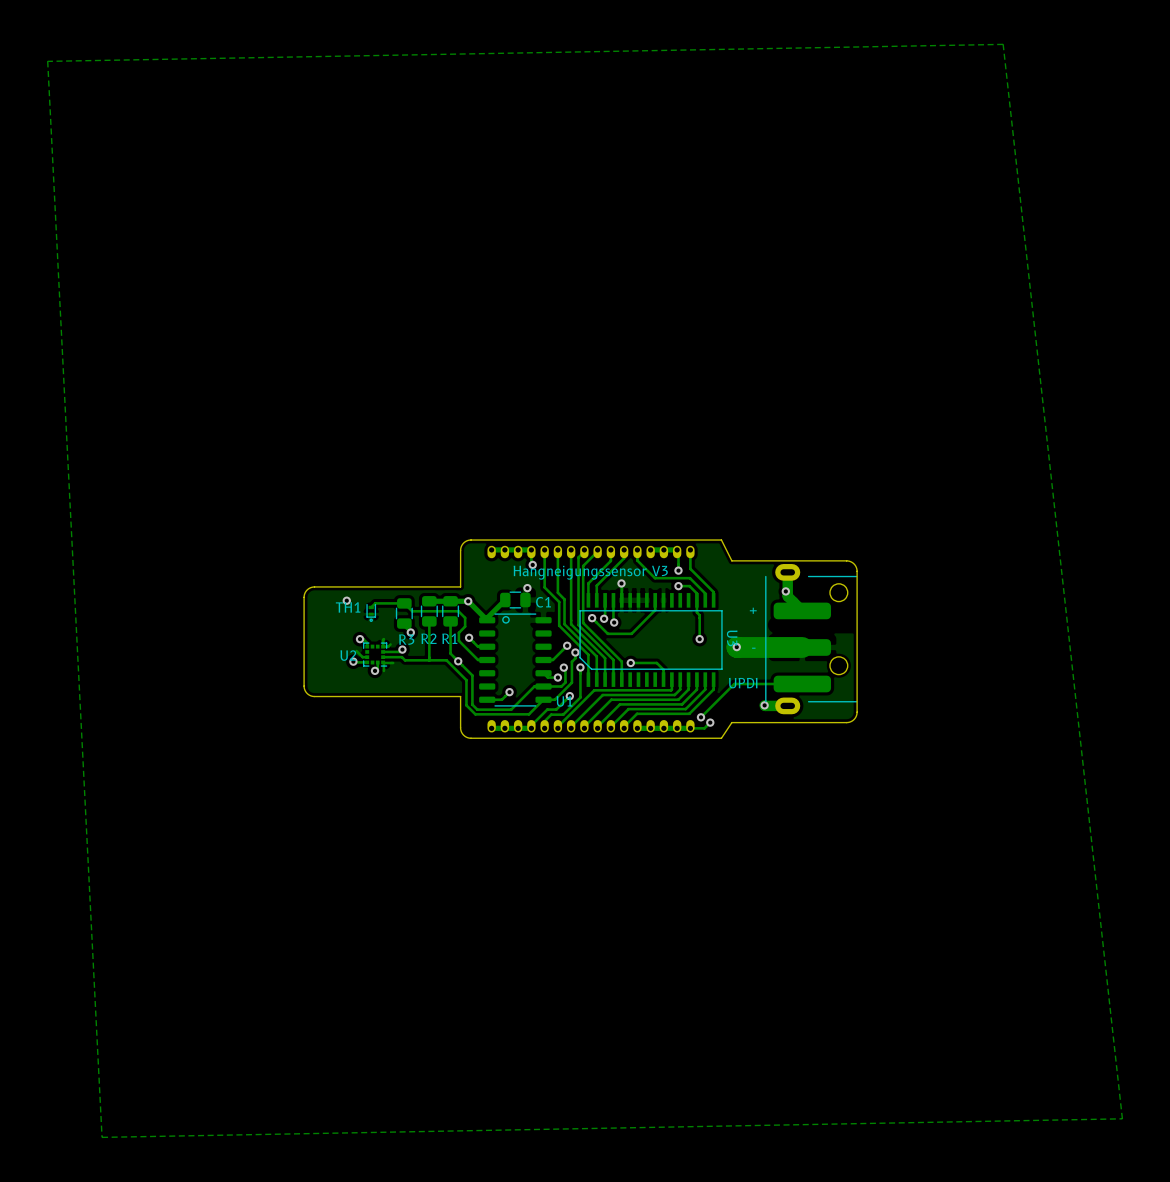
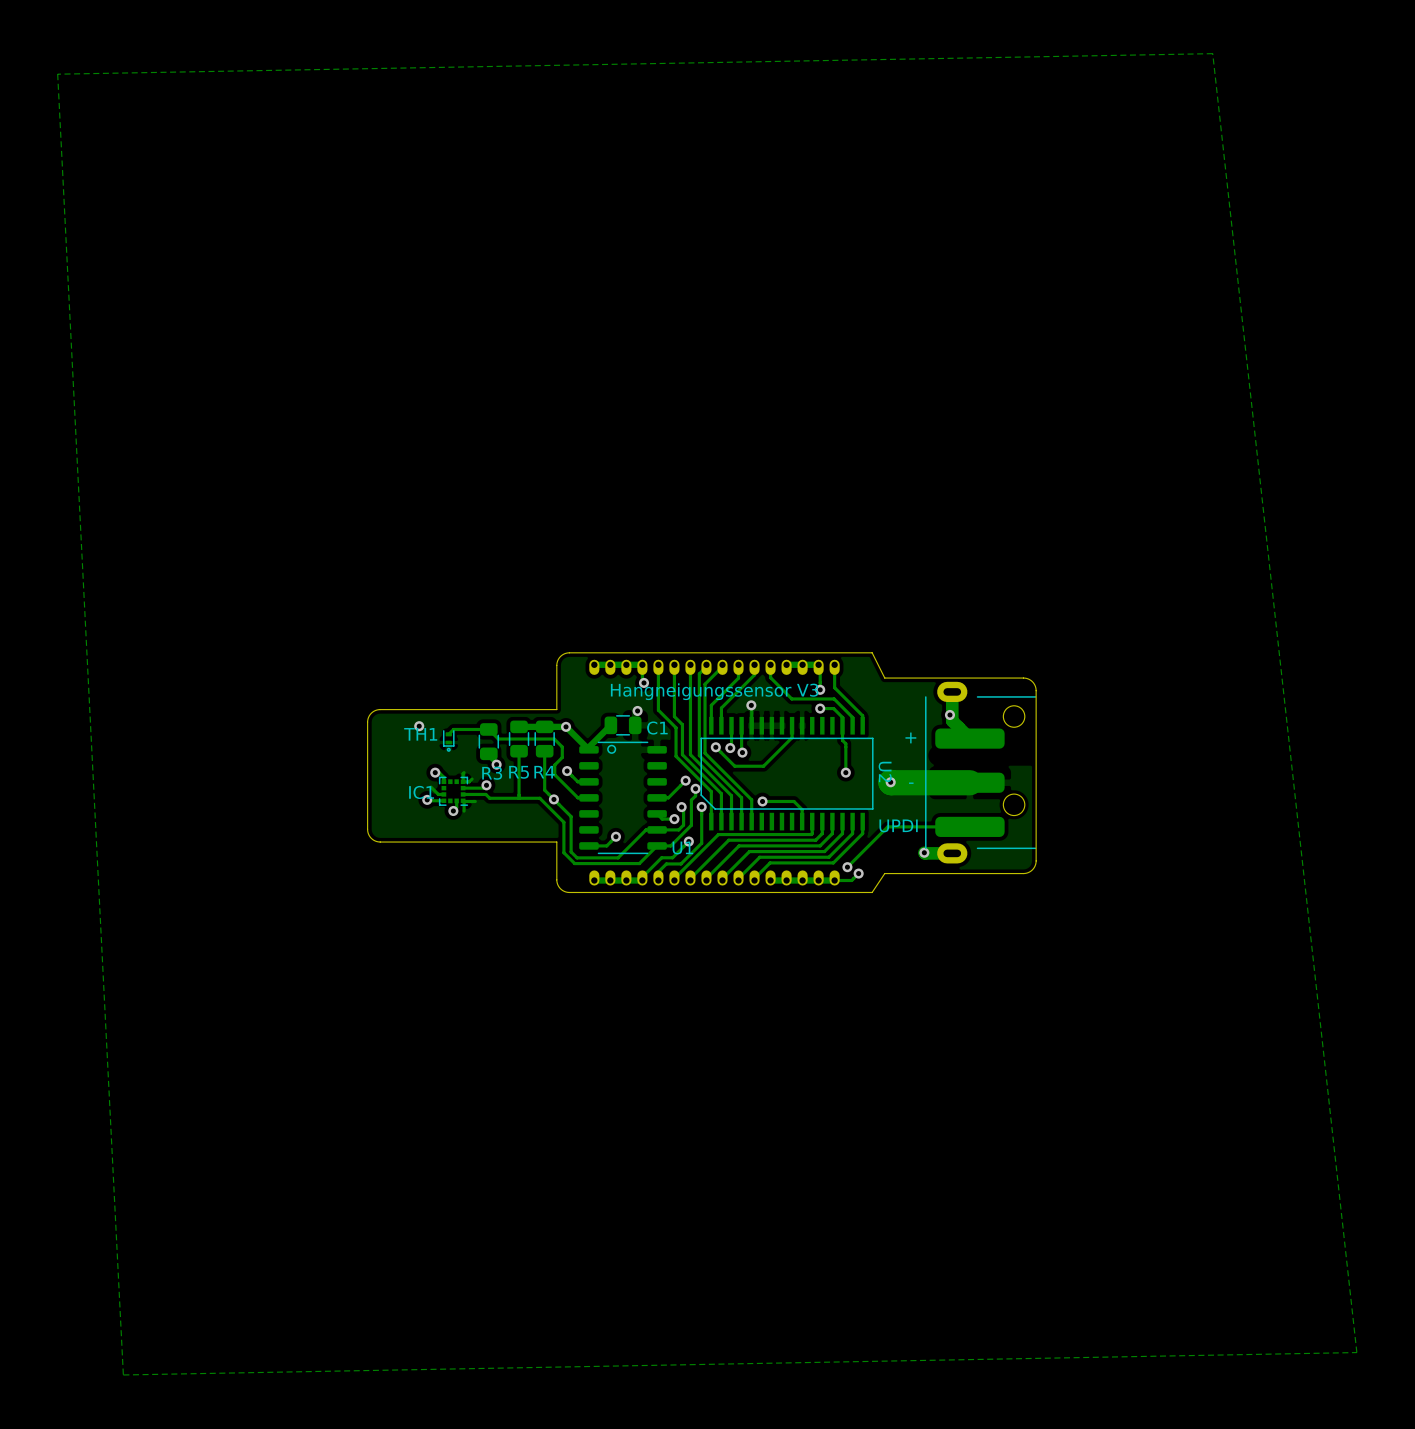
R2 name: R2 (428, 638) -> R5 (519, 772)
R1 name: R1 (449, 638) -> R4 (544, 772)
U3 name: U3 (732, 638) -> U2 (885, 771)
U2 name: U2 (348, 655) -> IC1 (421, 792)

